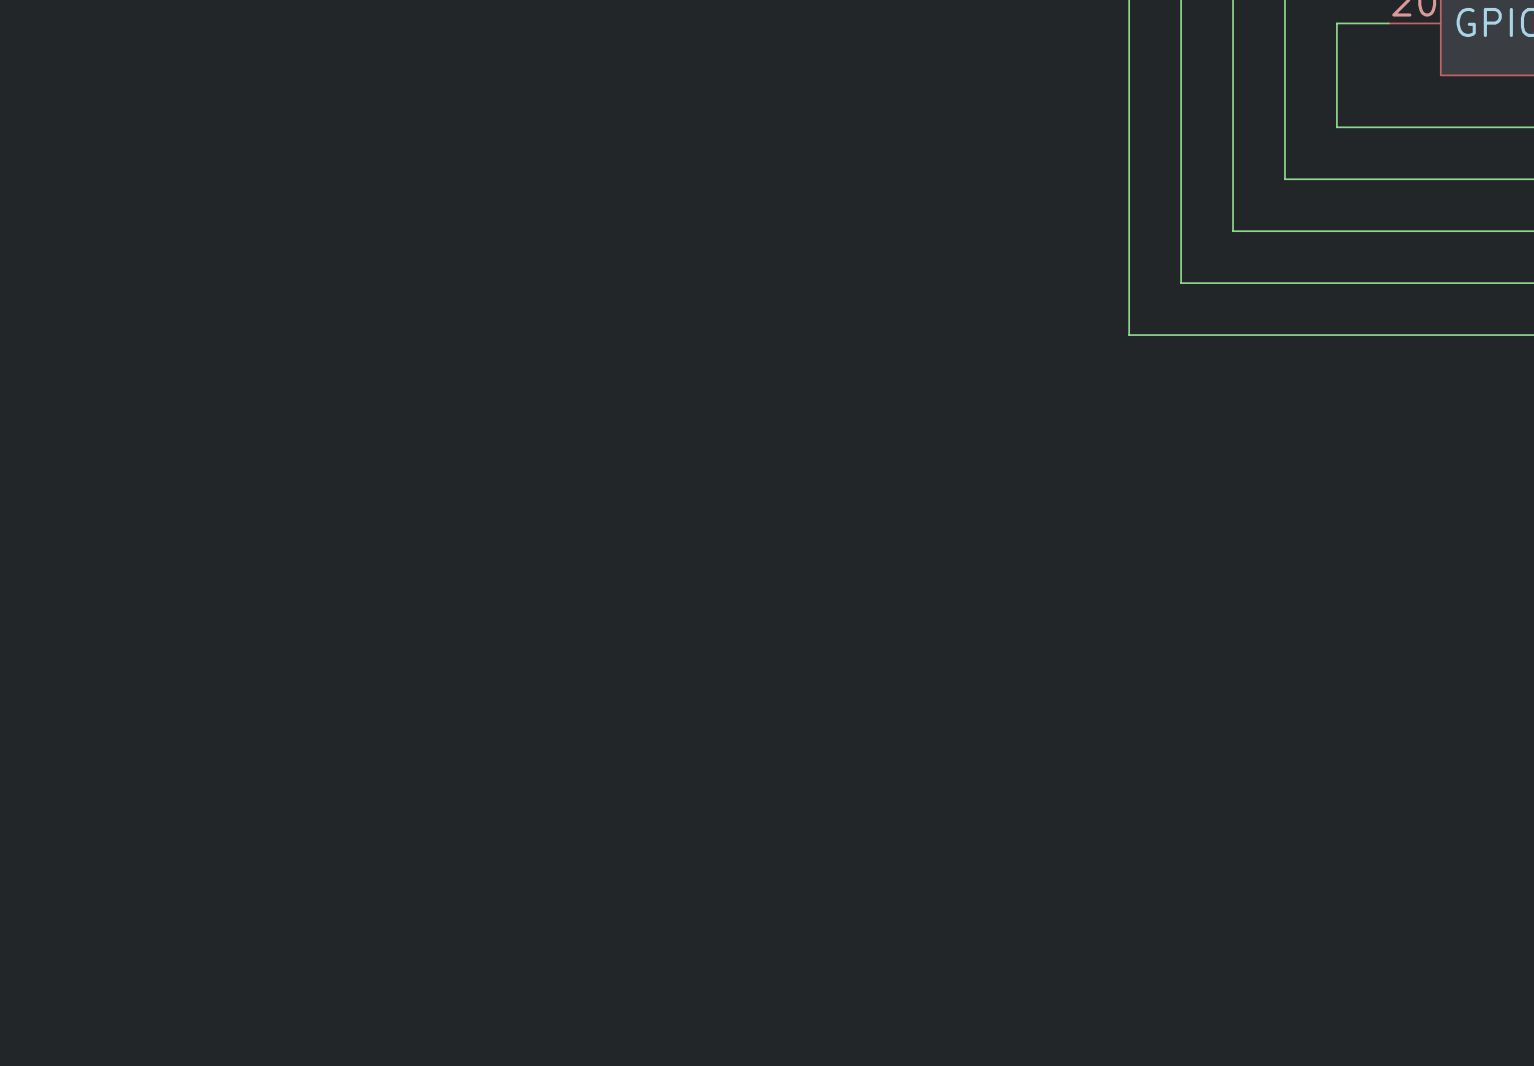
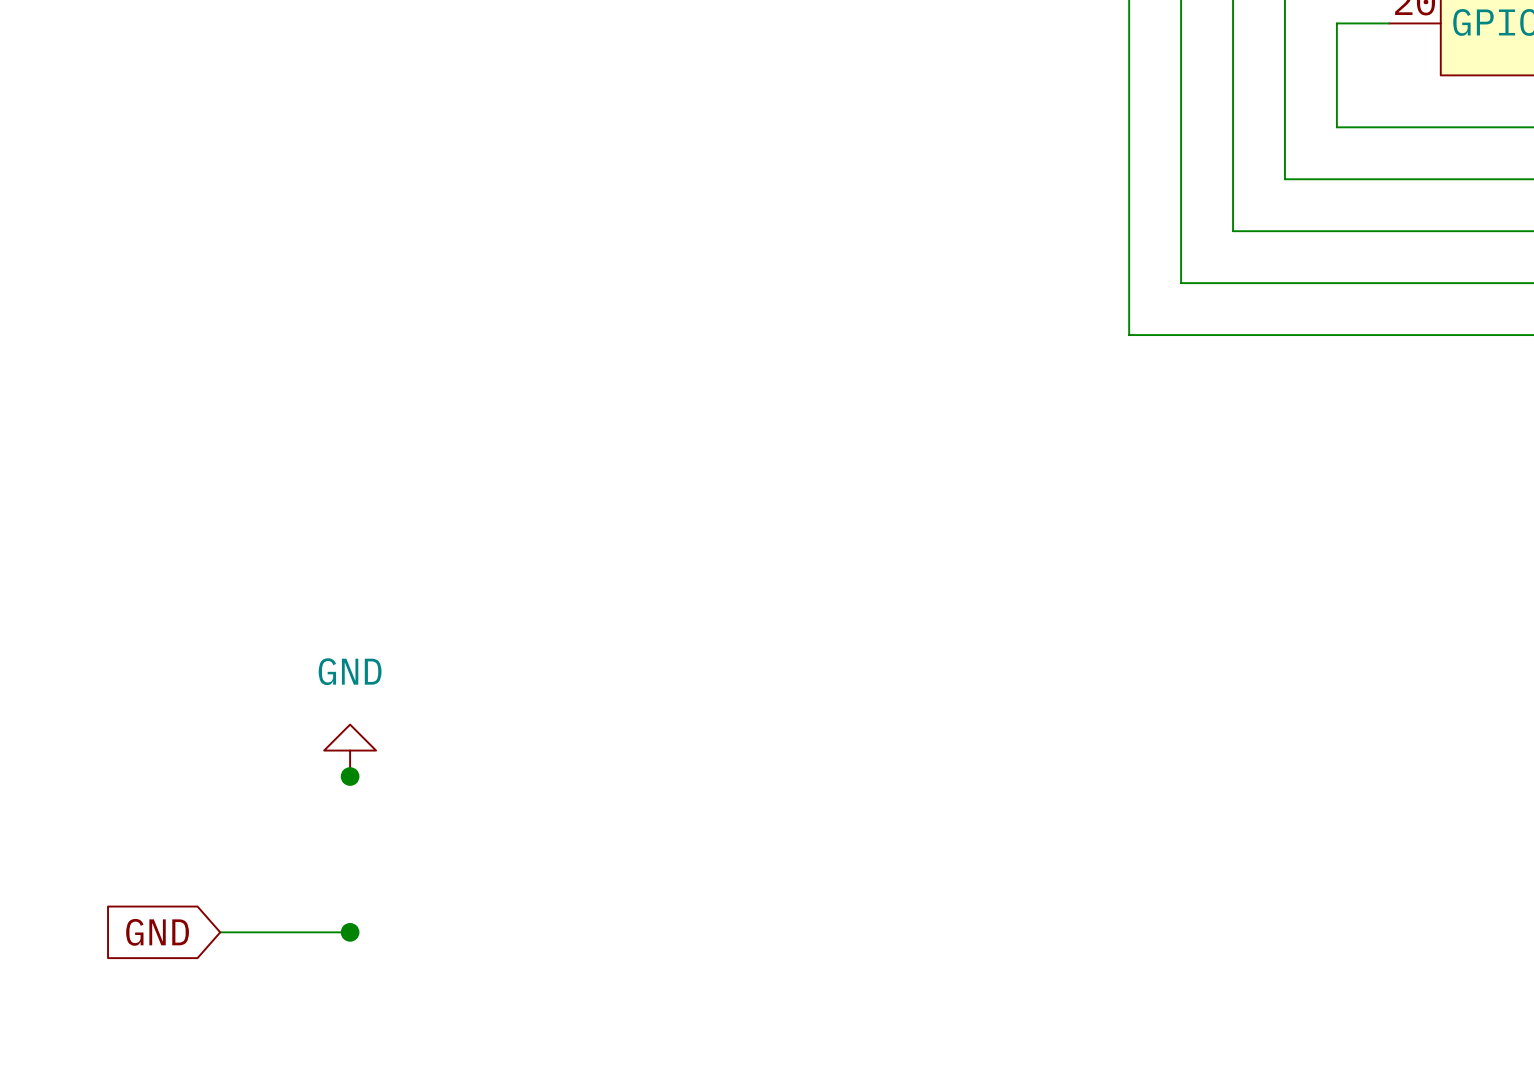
power symbol: none -> GND (350, 750)
junction: none -> (350, 776)
global label: none -> GND (157, 932)
wire: none -> (220, 932) (350, 932)
junction: none -> (350, 932)

